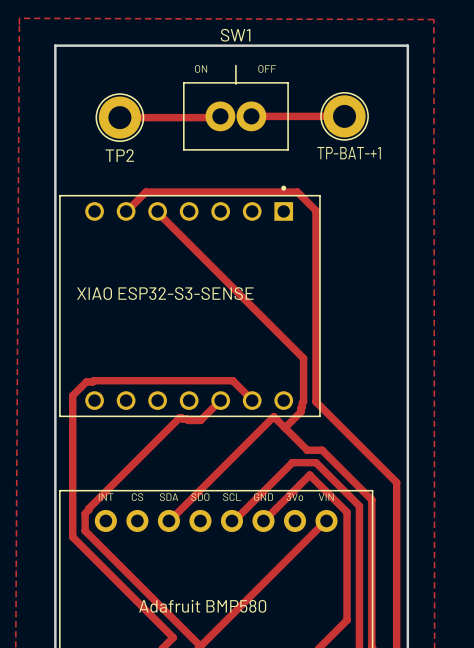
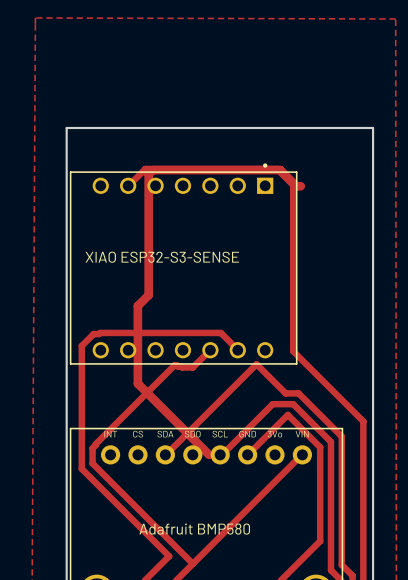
SW1: (235, 107) -> none
top track: (220, 116) (119, 117) -> none
top track: (251, 116) (344, 116) -> none
TP-BAT-+1: (344, 116) -> none
TP2: (119, 117) -> none
board edge: (55, 144) (55, 45) (407, 45) (407, 144) -> (66, 127) (373, 127)
top track: (157, 211) (303, 358) (303, 401) (301, 411) (284, 427) -> none
top track: none -> (300, 186) (296, 186) (280, 170) (152, 170) (148, 174) (148, 295) (137, 305) (137, 383) (209, 454)

